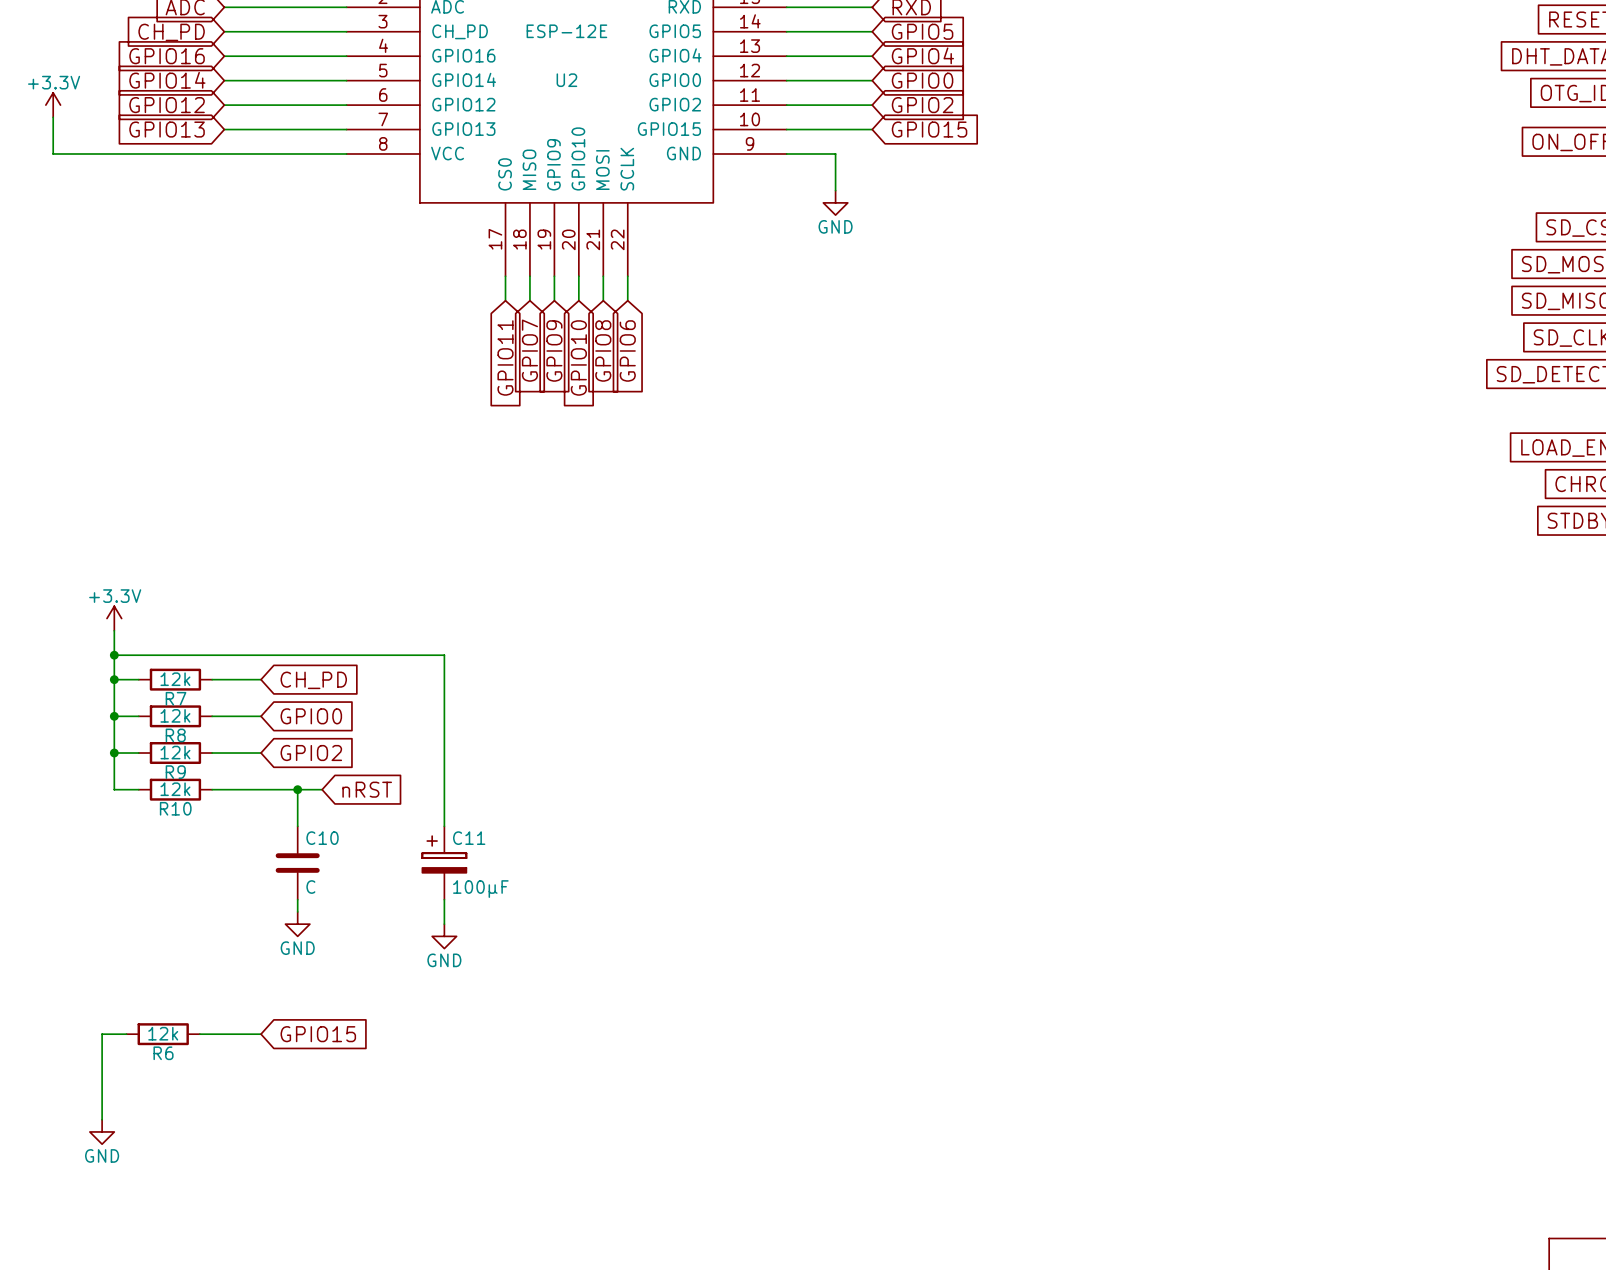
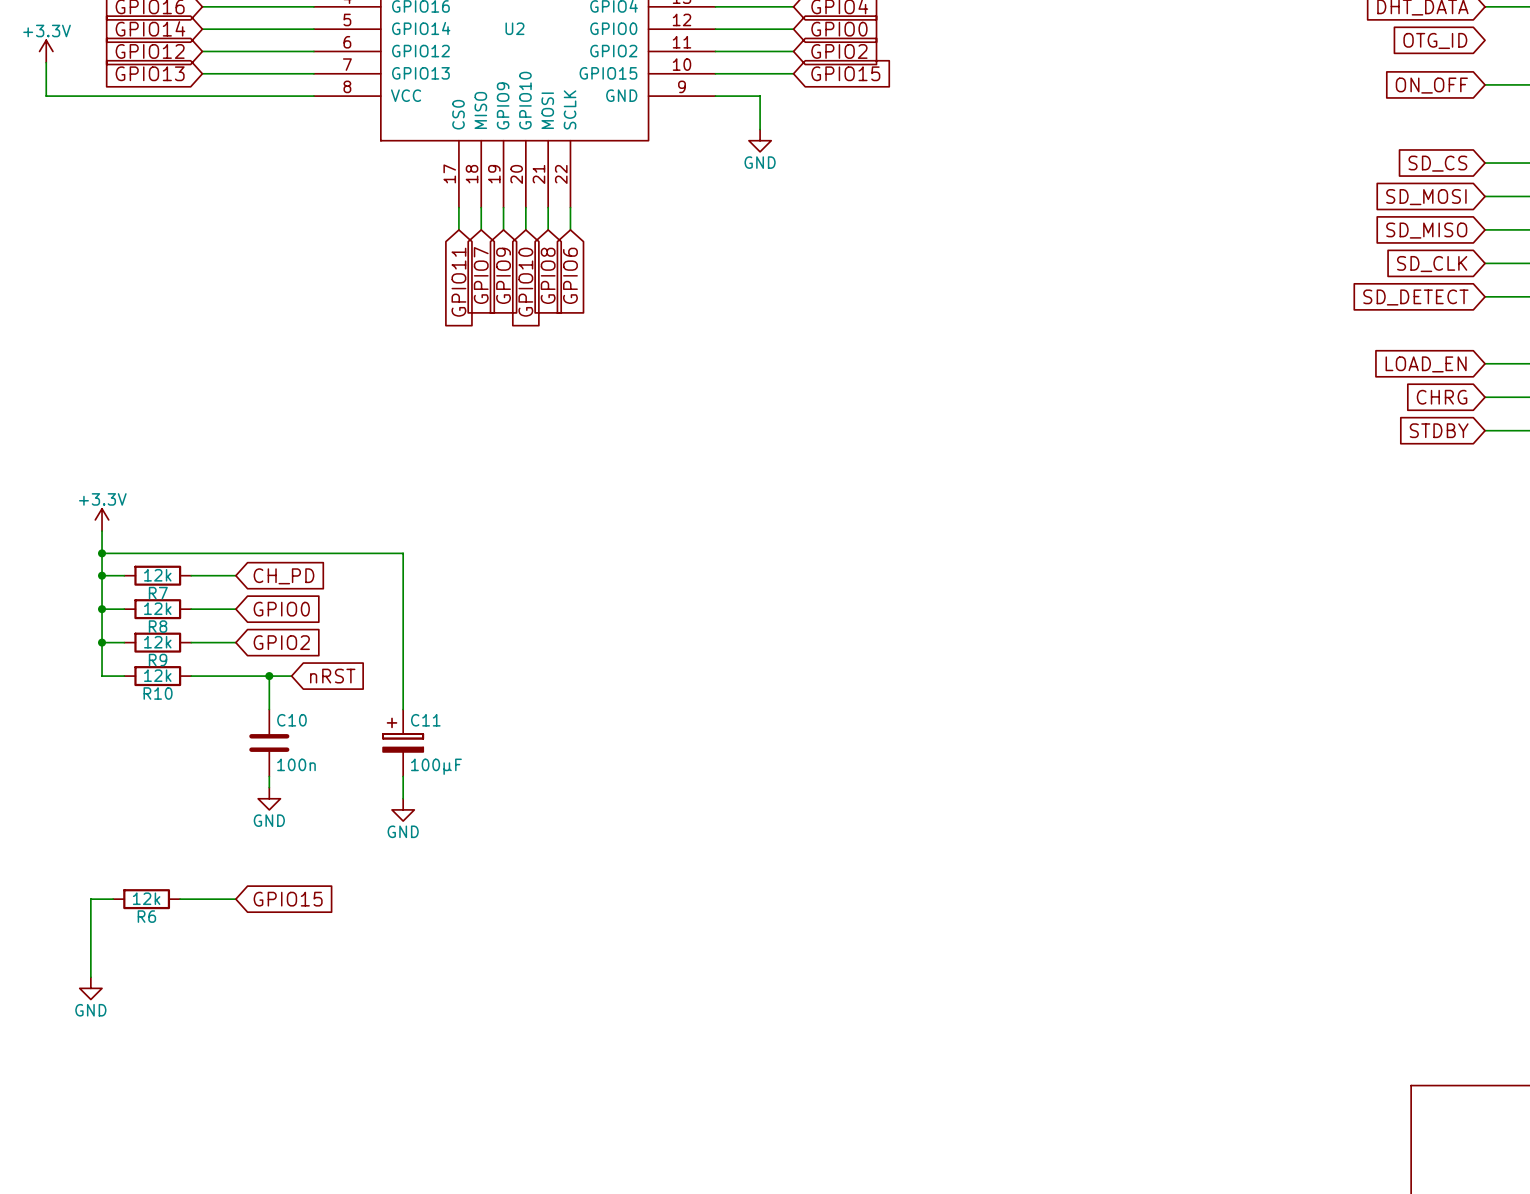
C10 value: C (310, 887) -> 100n (296, 764)

